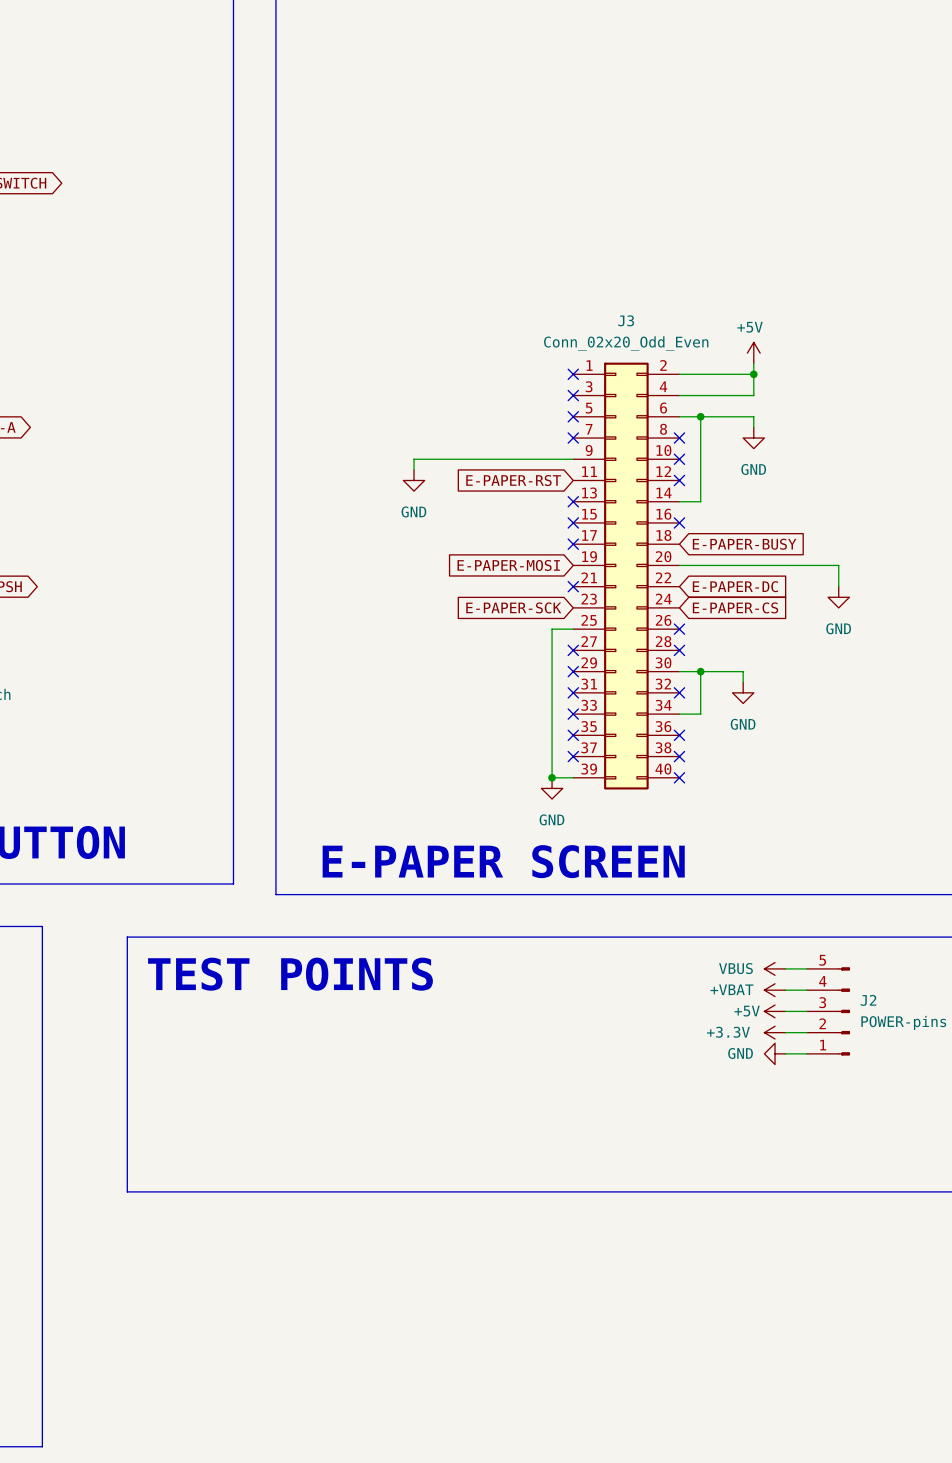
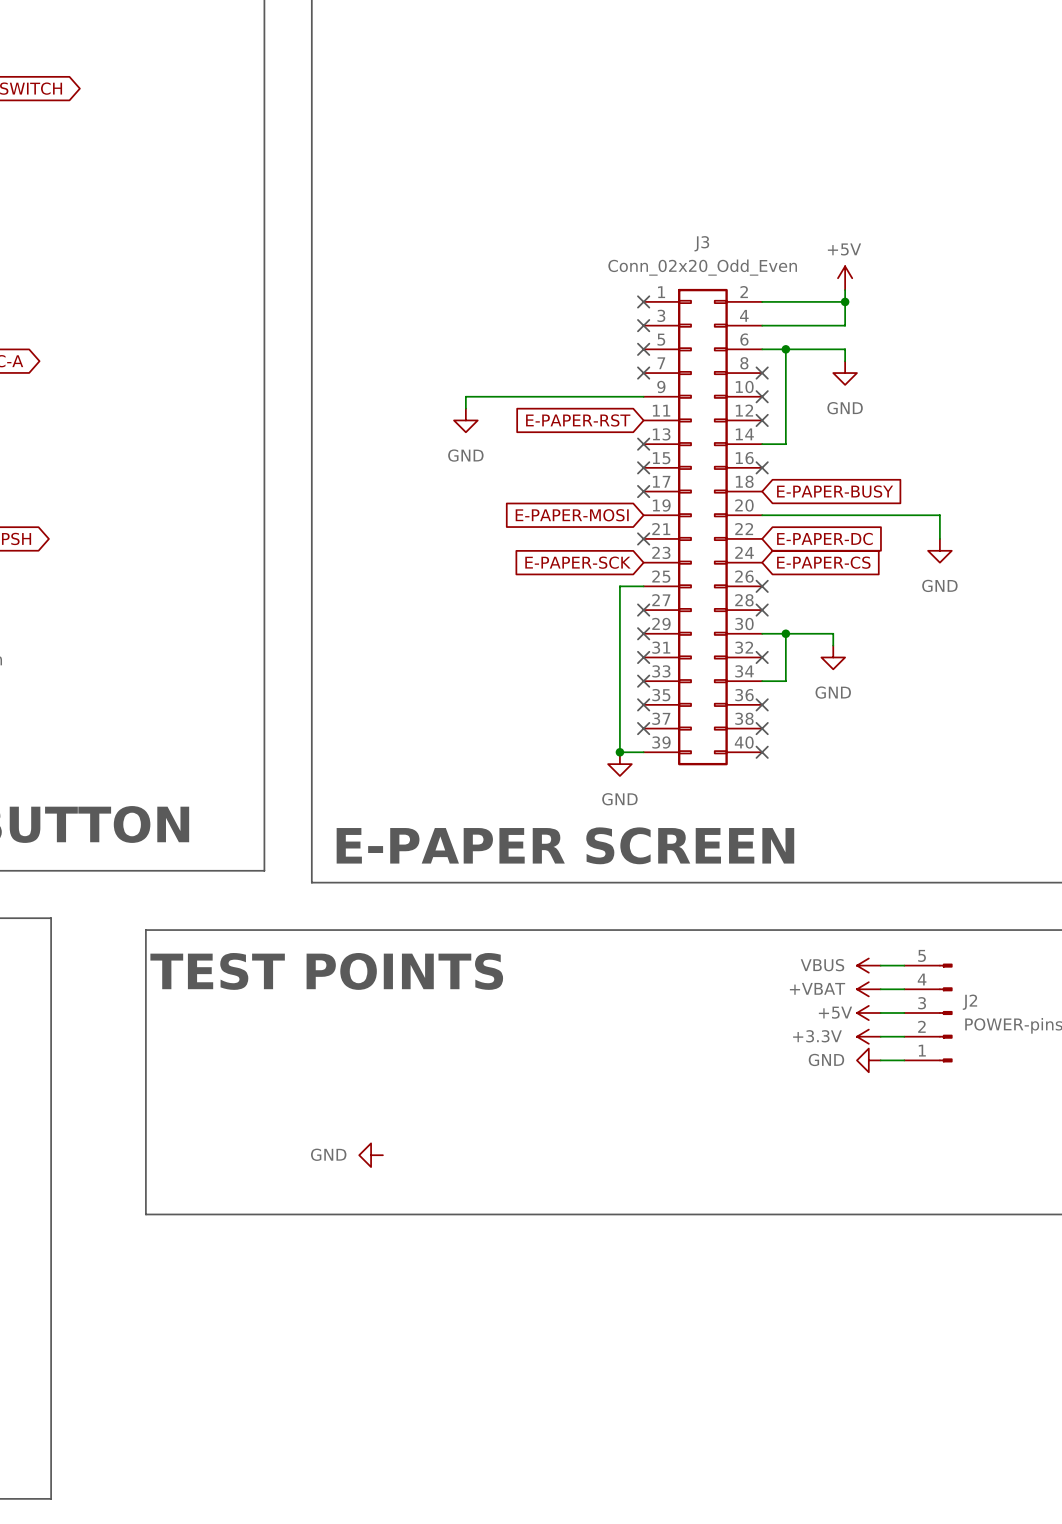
power symbol: none -> GND (371, 1155)

